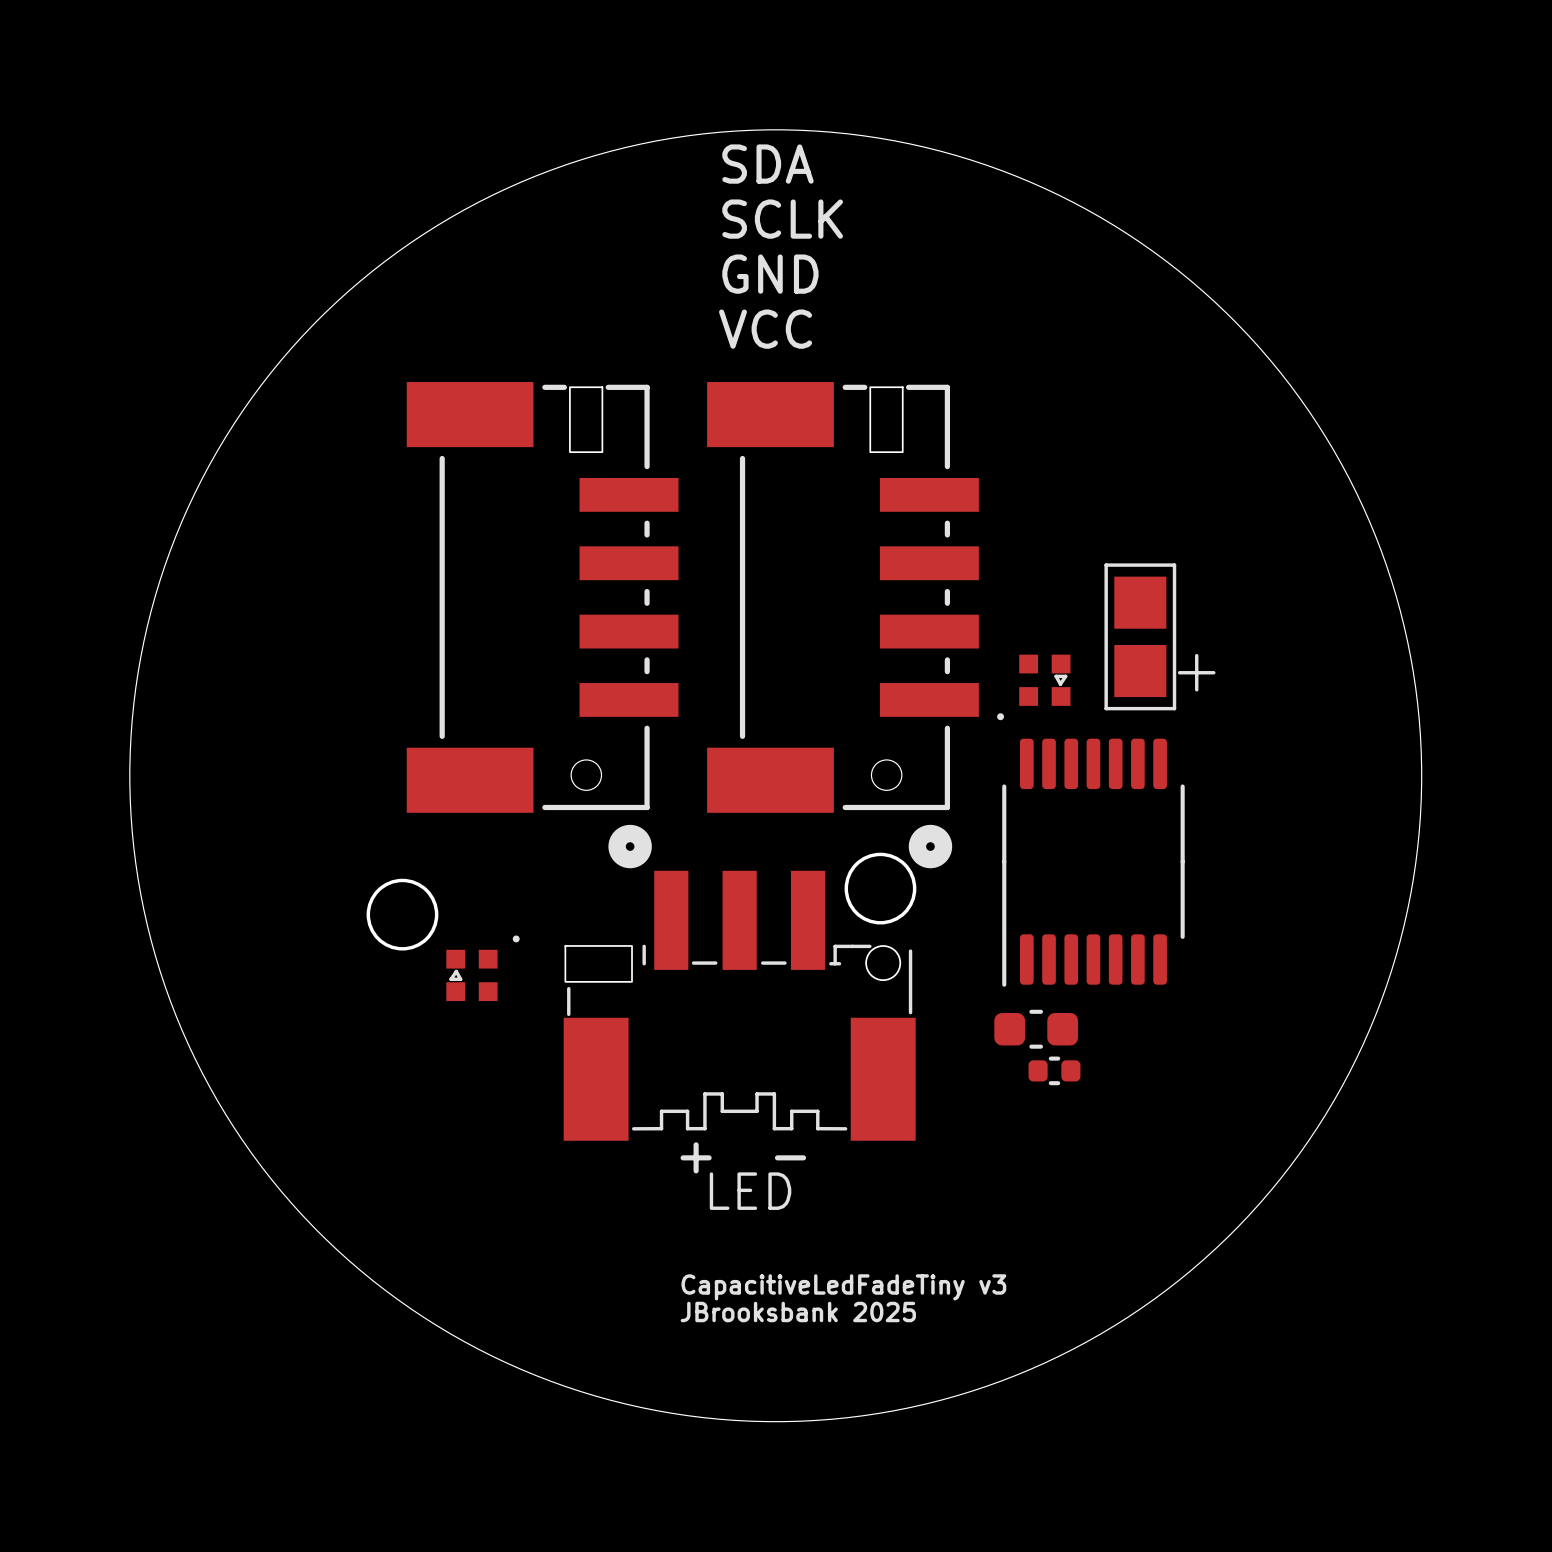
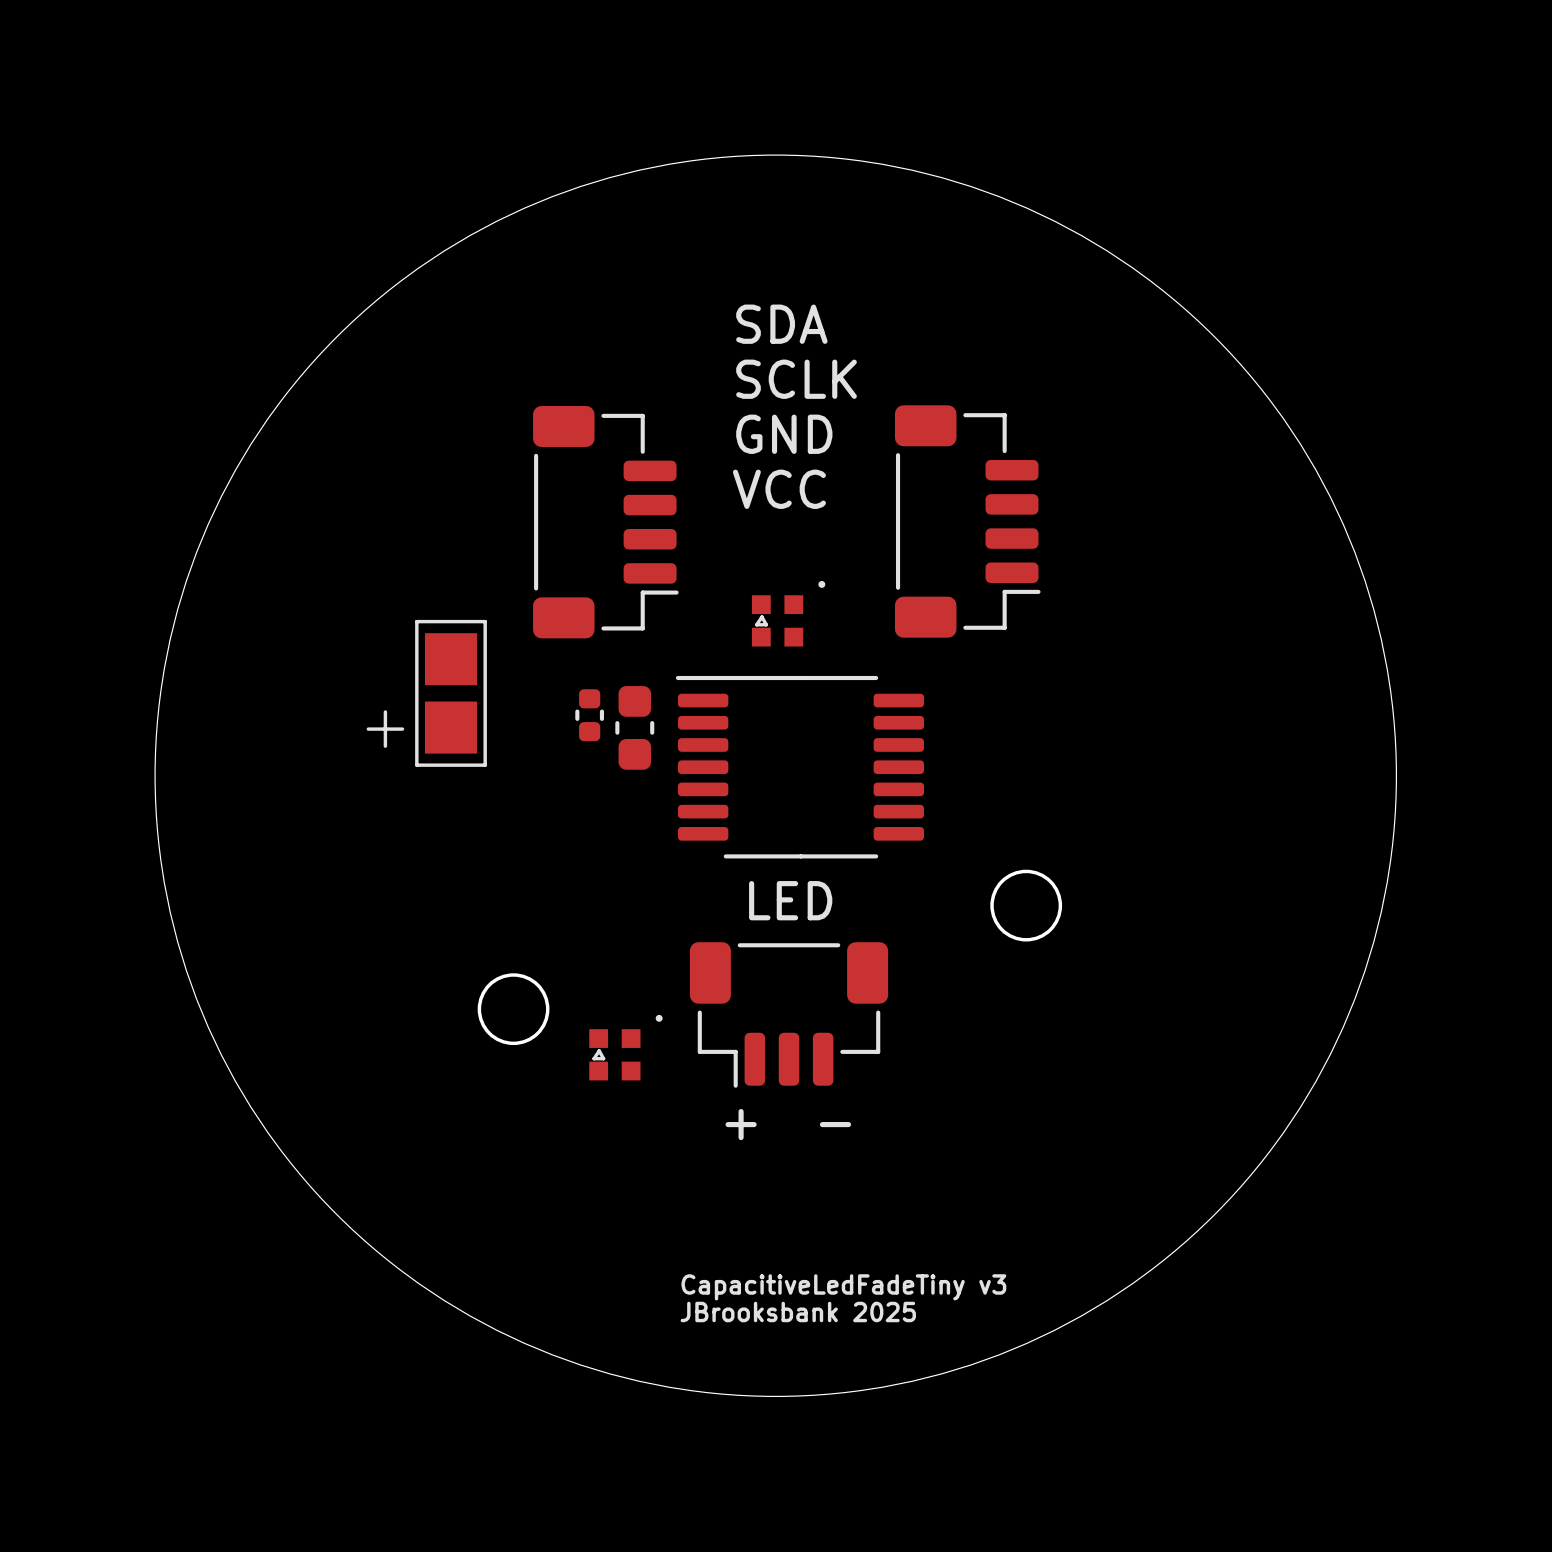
round board edge size: [129, 129, 1422, 1422] -> [155, 155, 1397, 1397]
text position: SDA (767, 164) -> SDA (781, 324)
text position: SCLK (782, 219) -> SCLK (796, 379)
text position: GND (770, 274) -> GND (784, 434)
text position: VCC (765, 329) -> VCC (779, 489)
part: none -> (967, 521)
part: none -> (605, 522)
part: none -> (788, 613)
part: (542, 625) -> none
part: (842, 625) -> none
part: (1159, 636) -> none
part: (1033, 687) -> none
part: none -> (426, 693)
part rotation: 0° (1093, 862) -> 90° clockwise (799, 767)
part position: (1093, 862) -> (799, 767)
round board edge position: (880, 888) -> (1026, 905)
round board edge position: (402, 914) -> (513, 1009)
part position: (482, 968) -> (625, 1047)
LED: (739, 1005) -> none
LED: none -> (789, 1014)
part rotation: 0° (1036, 1029) -> 90° clockwise (634, 727)
part position: (1036, 1029) -> (634, 727)
part rotation: 0° (1054, 1070) -> 90° clockwise (589, 715)
part position: (1054, 1070) -> (589, 715)
text position: + - (743, 1157) -> + - (788, 1124)

